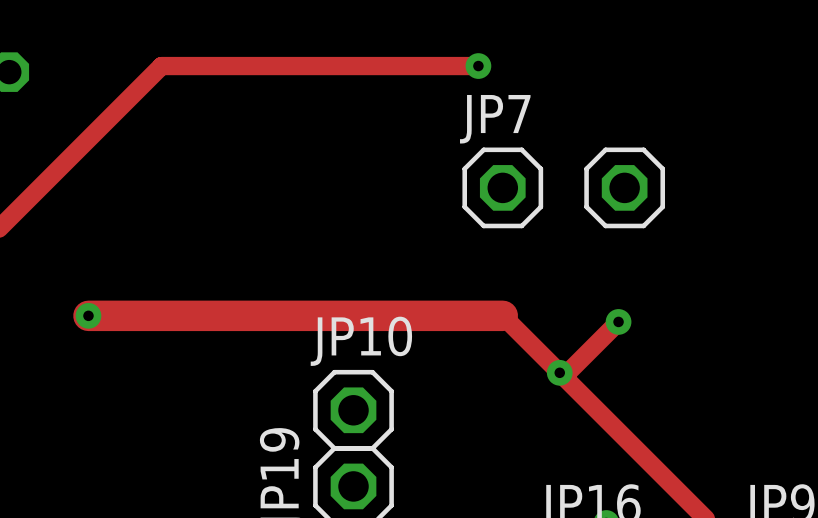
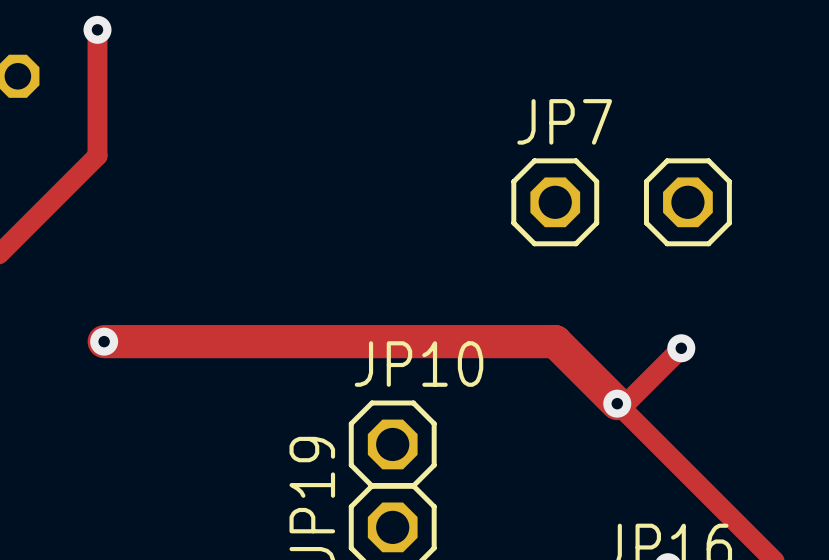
via: none -> (97, 29)
track: (478, 66) (161, 66) (82, 145) -> (97, 29) (97, 155)
via: (478, 66) -> none
track width: thin (502, 315) (559, 372) -> thick (555, 341) (617, 403)

